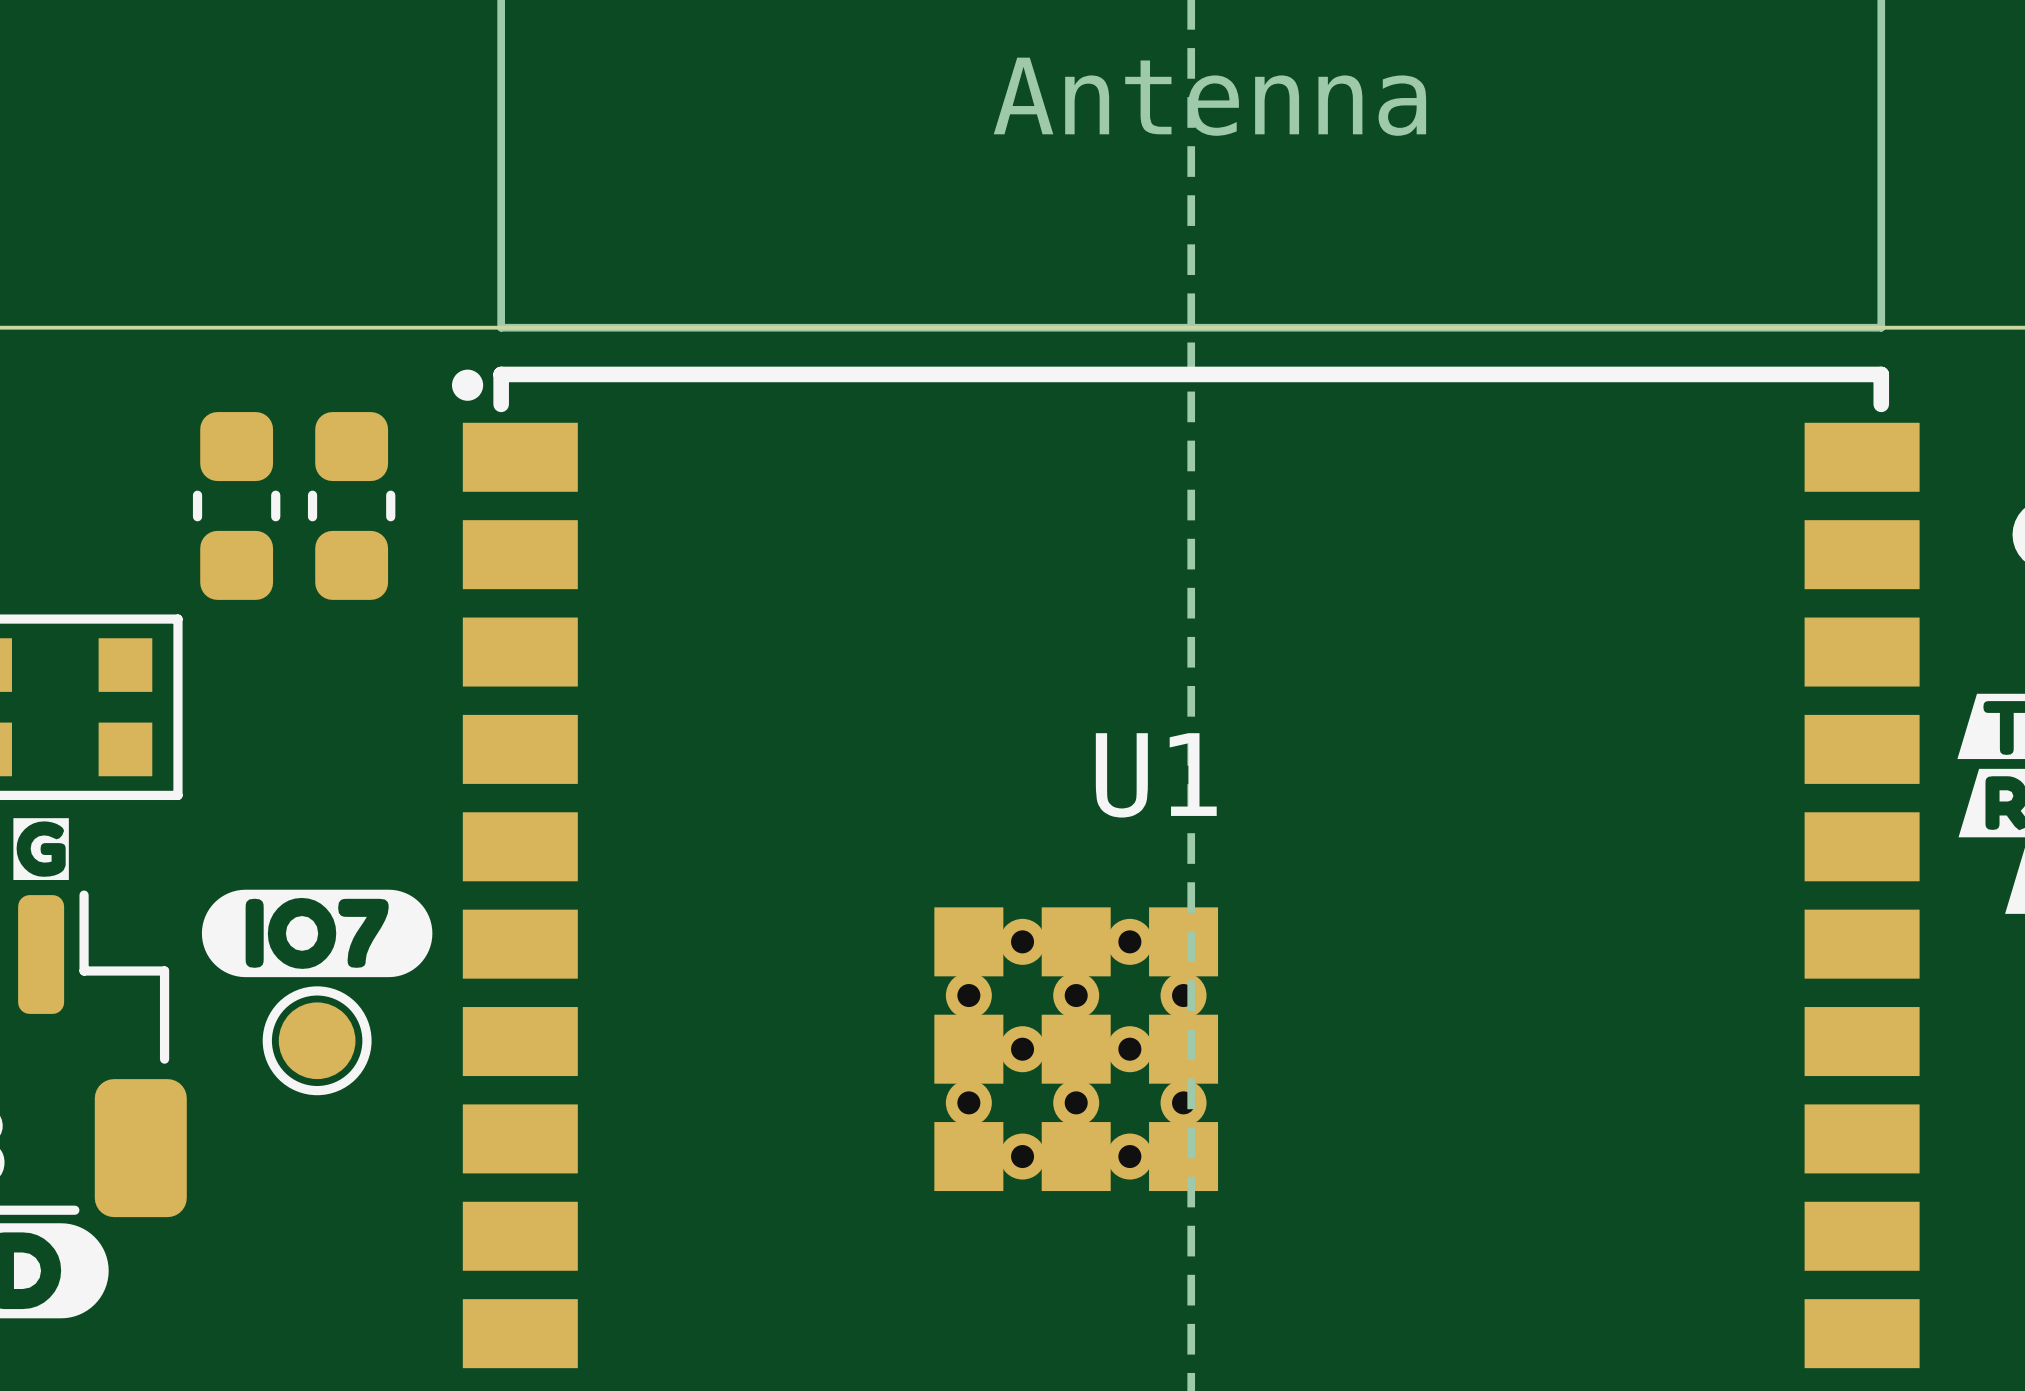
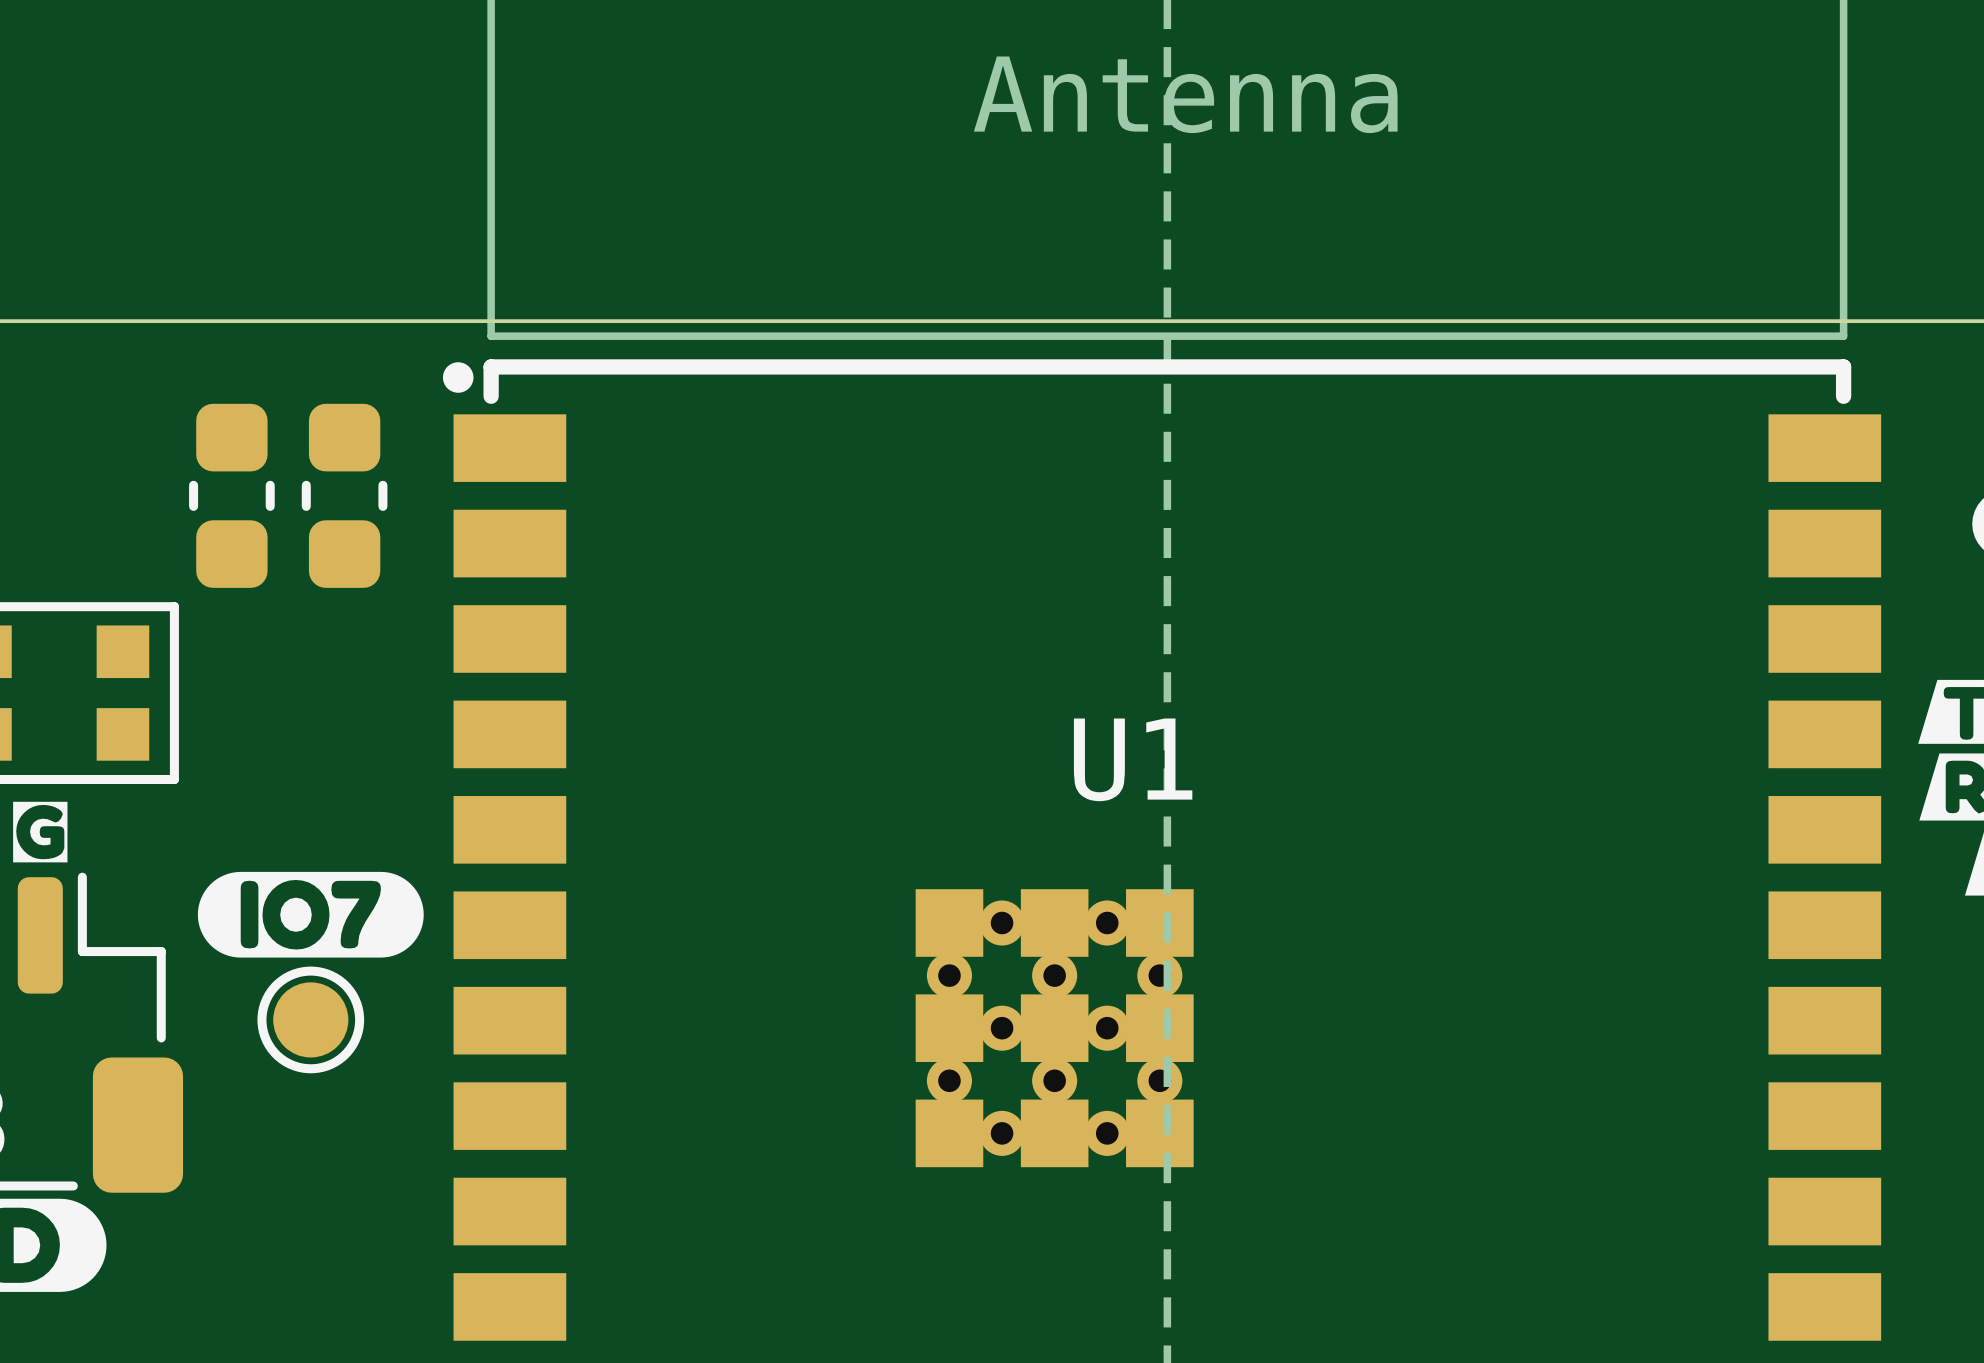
line: (501, 327) (1881, 327) -> (491, 321) (491, 336) (1843, 336) (1843, 321)

